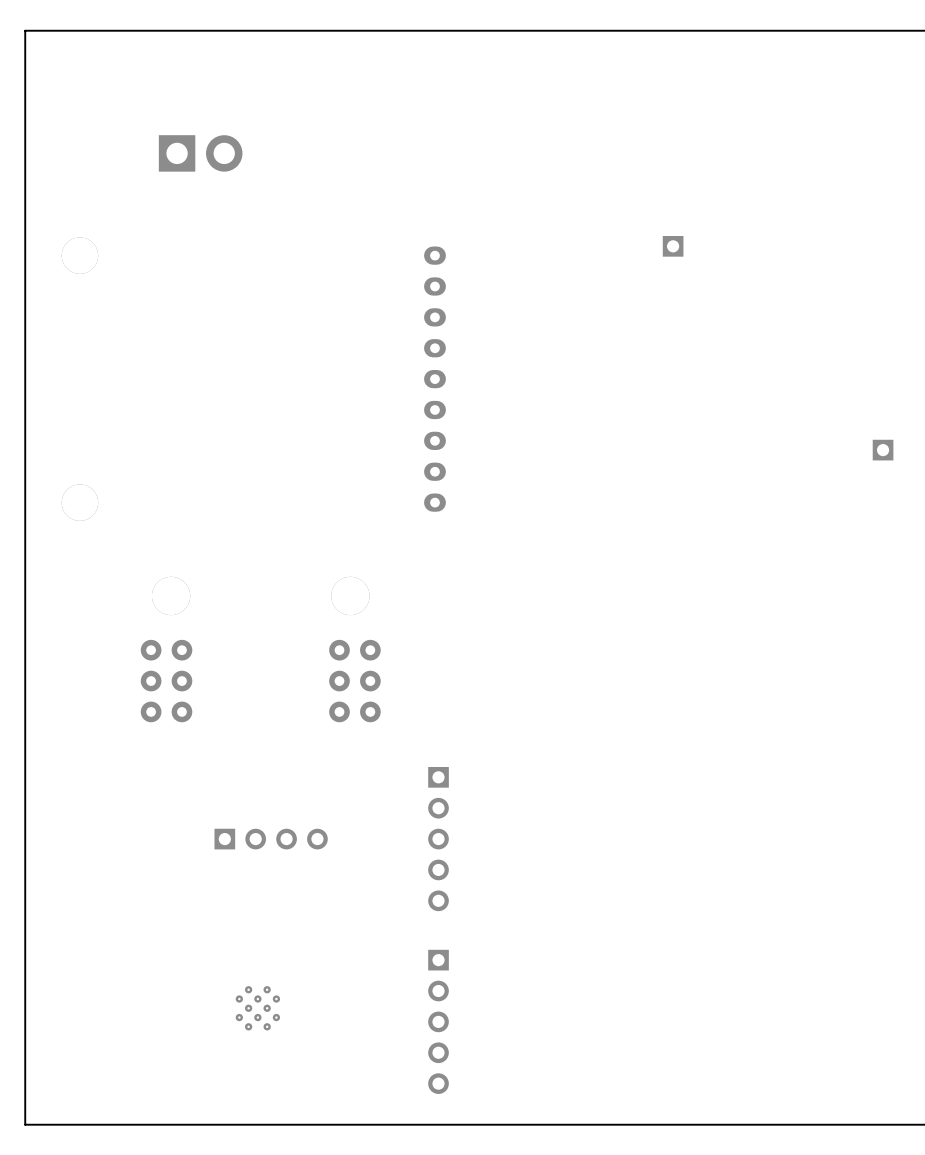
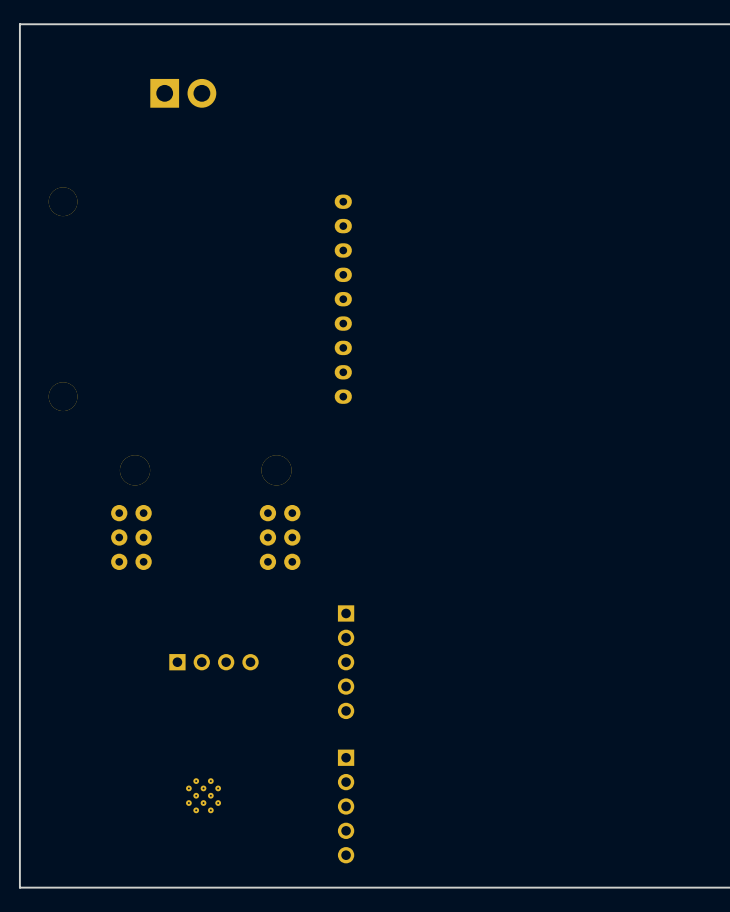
part position: (200, 153) -> (183, 93)
part: (673, 246) -> none
part: (883, 450) -> none

